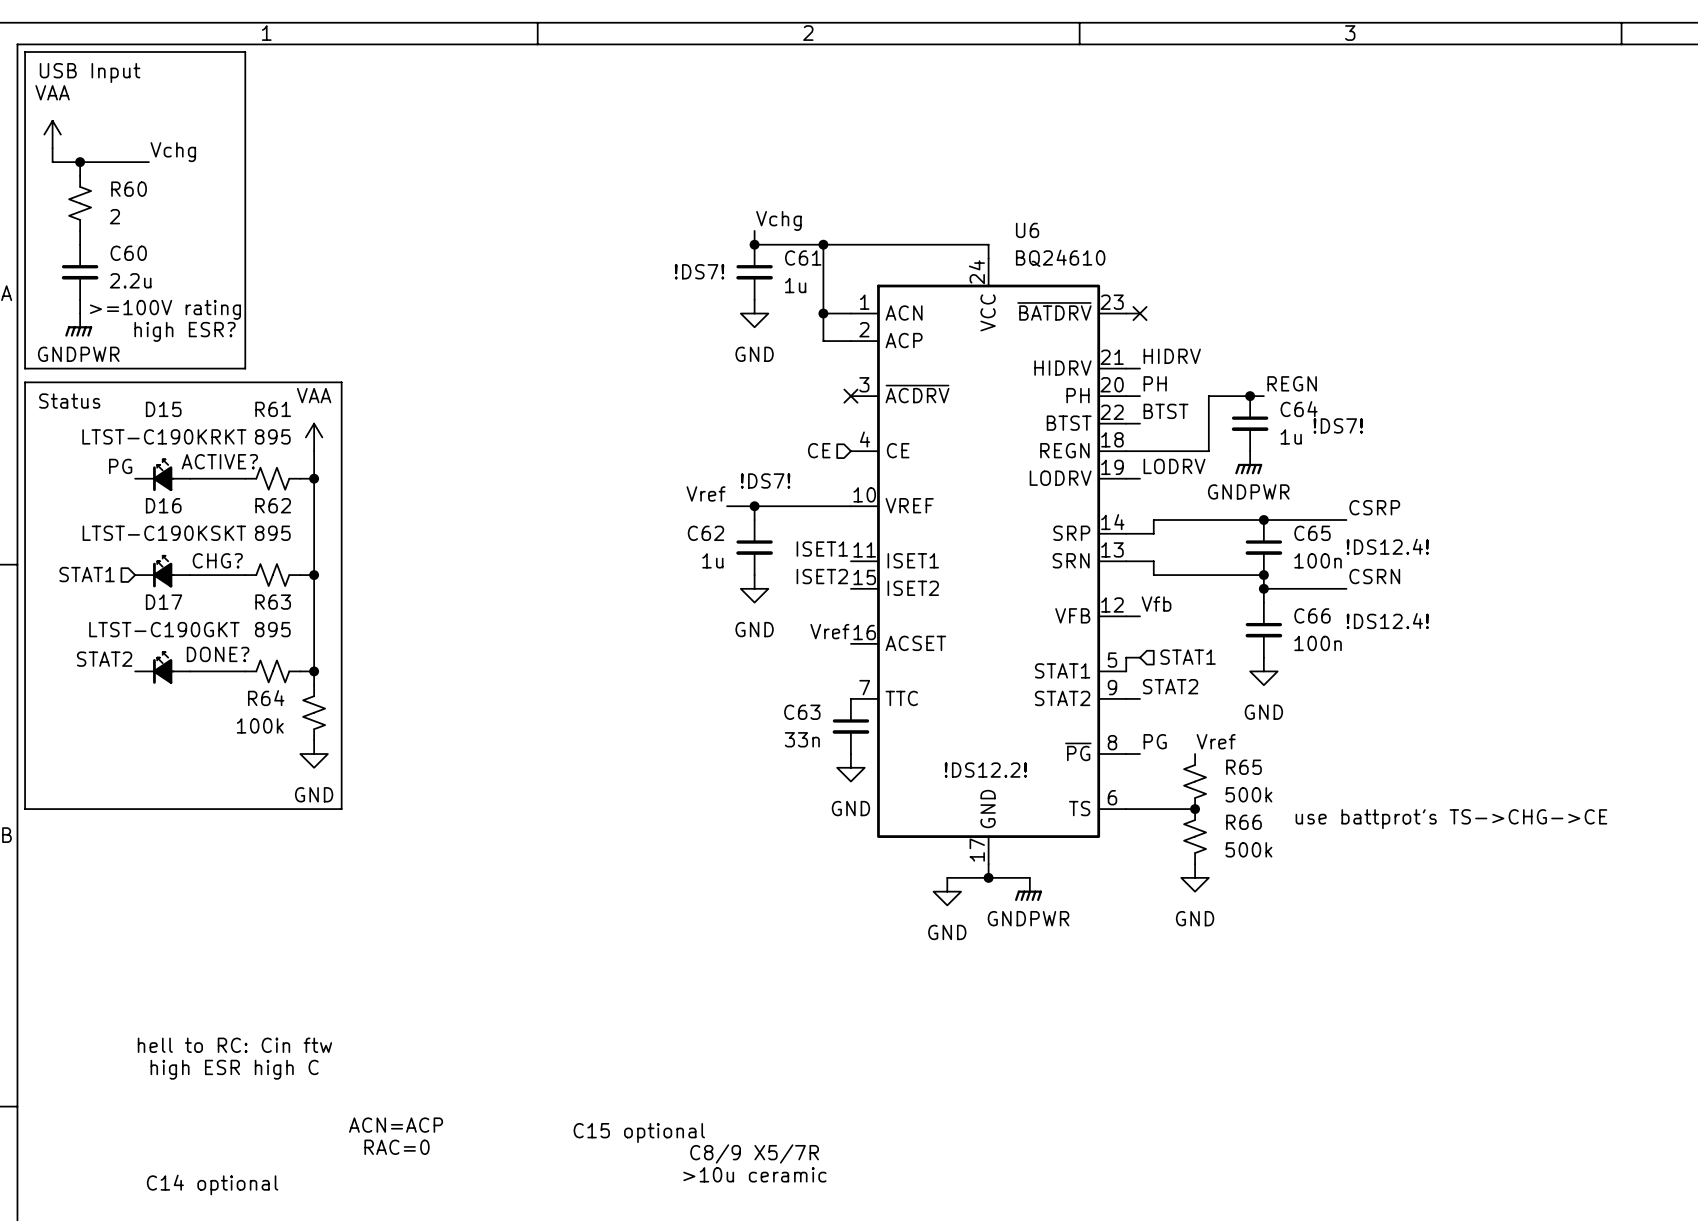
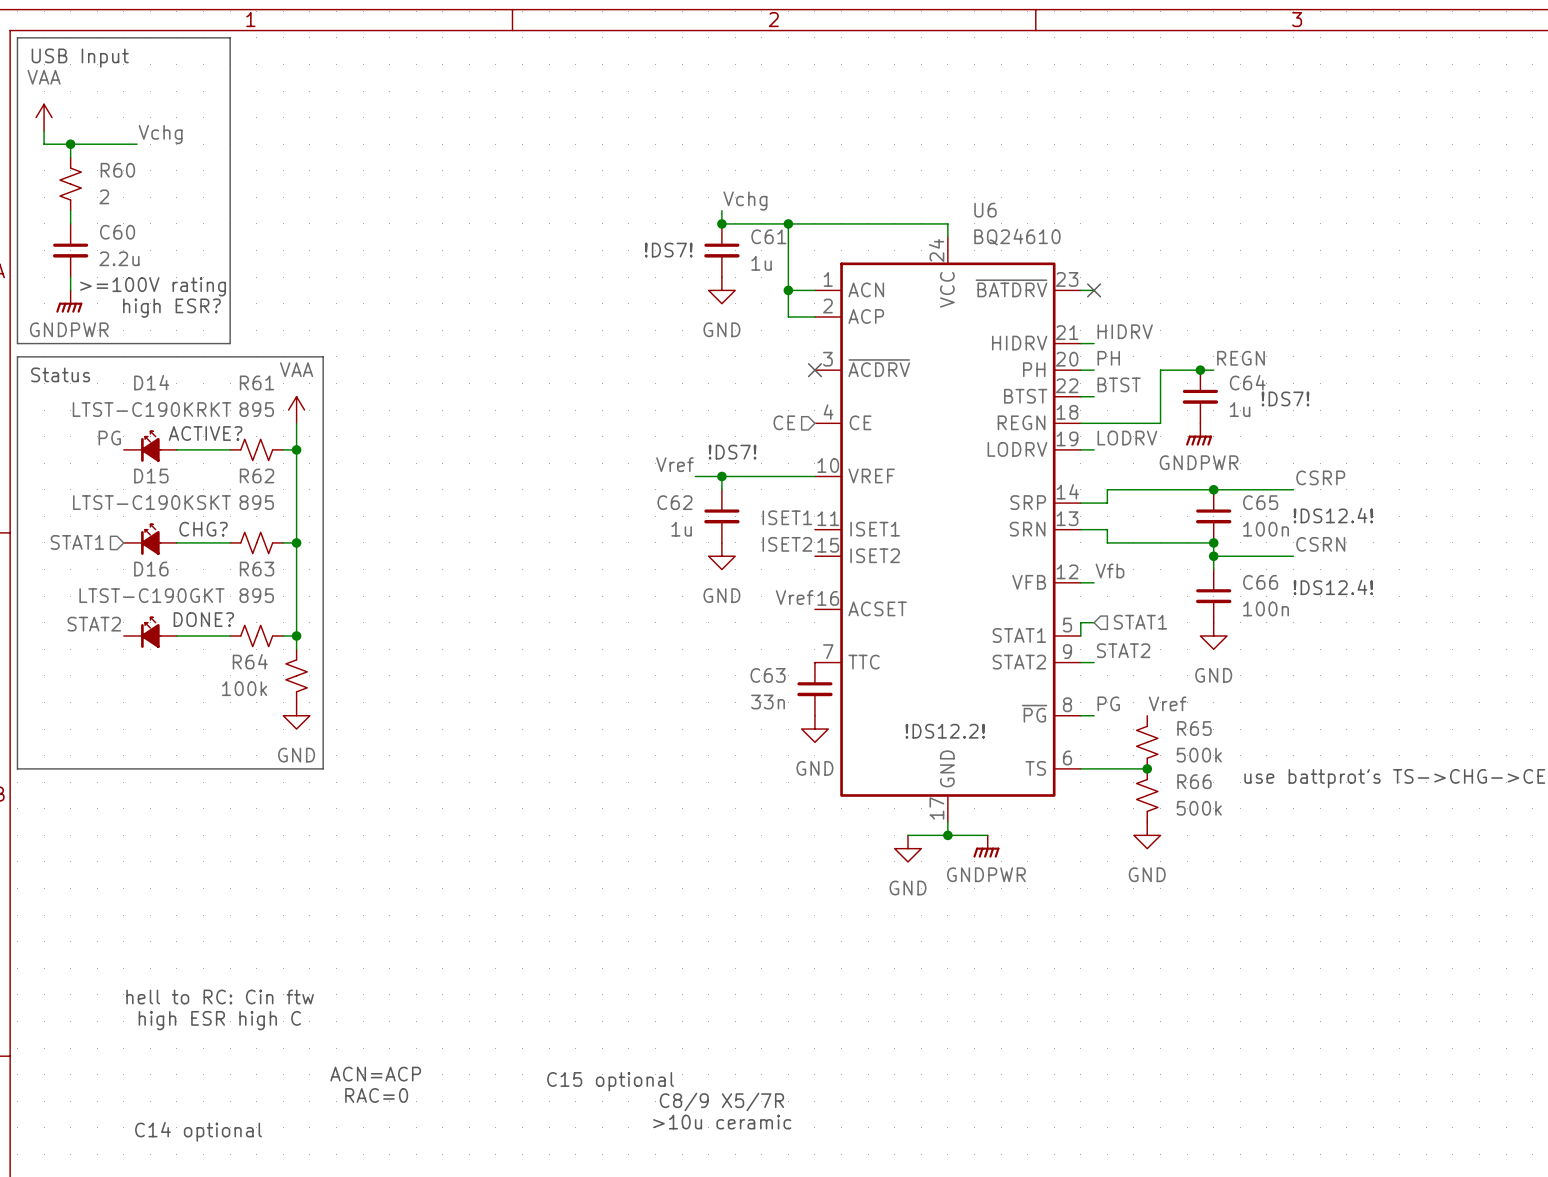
D15 name: D15 (163, 409) -> D14 (151, 382)
D16 name: D16 (163, 505) -> D15 (151, 475)
D17 name: D17 (164, 602) -> D16 (151, 569)

